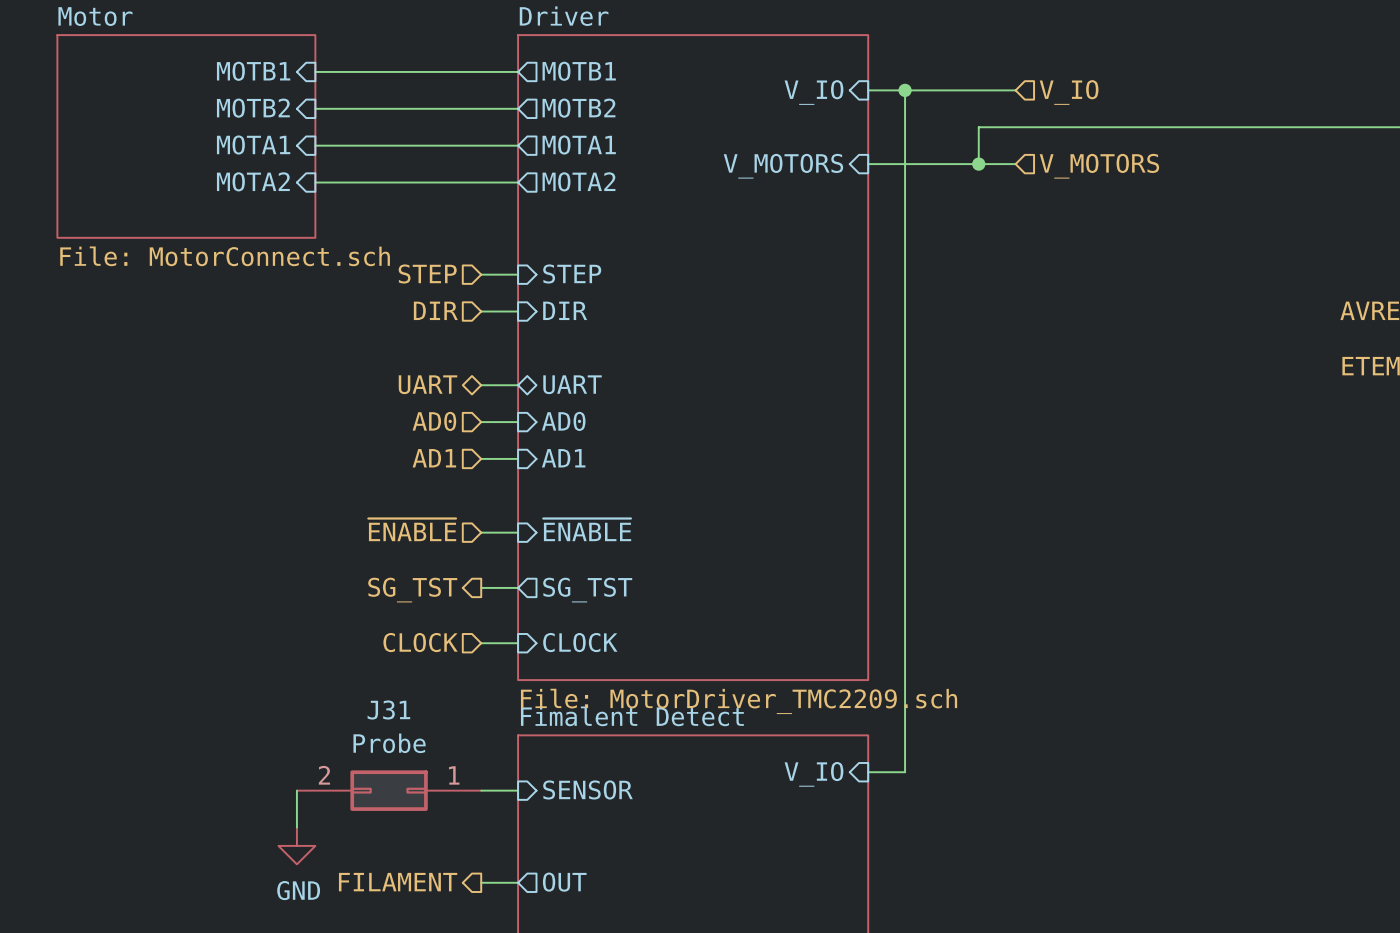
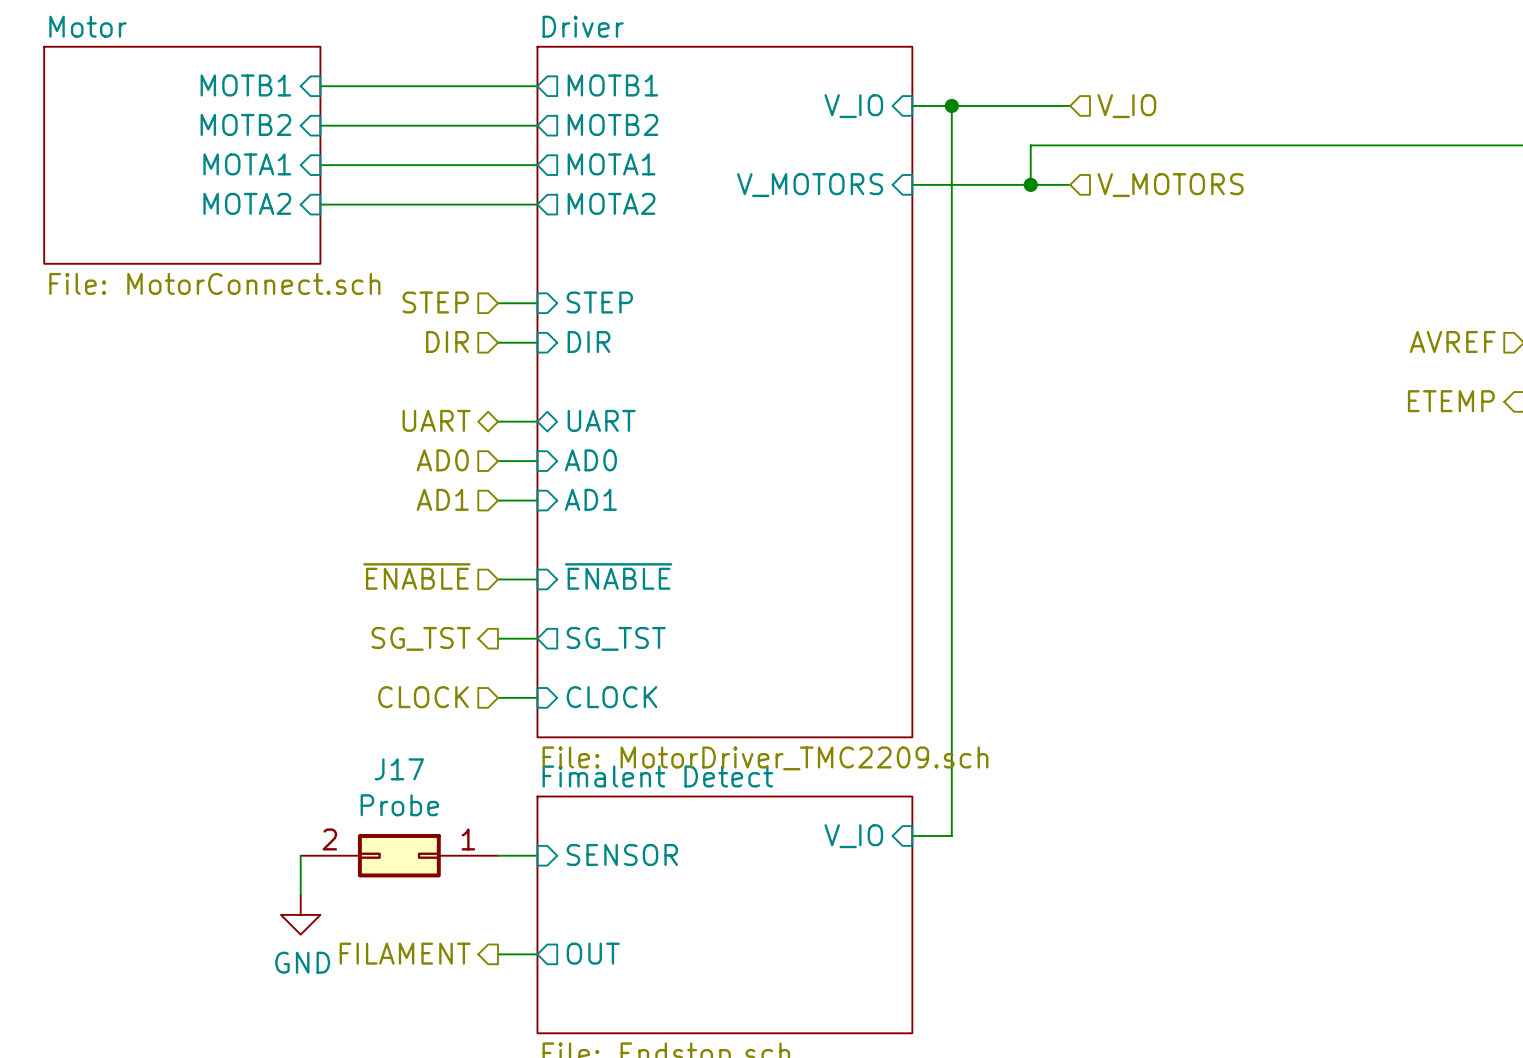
J31 name: J31 (388, 709) -> J17 (399, 769)

